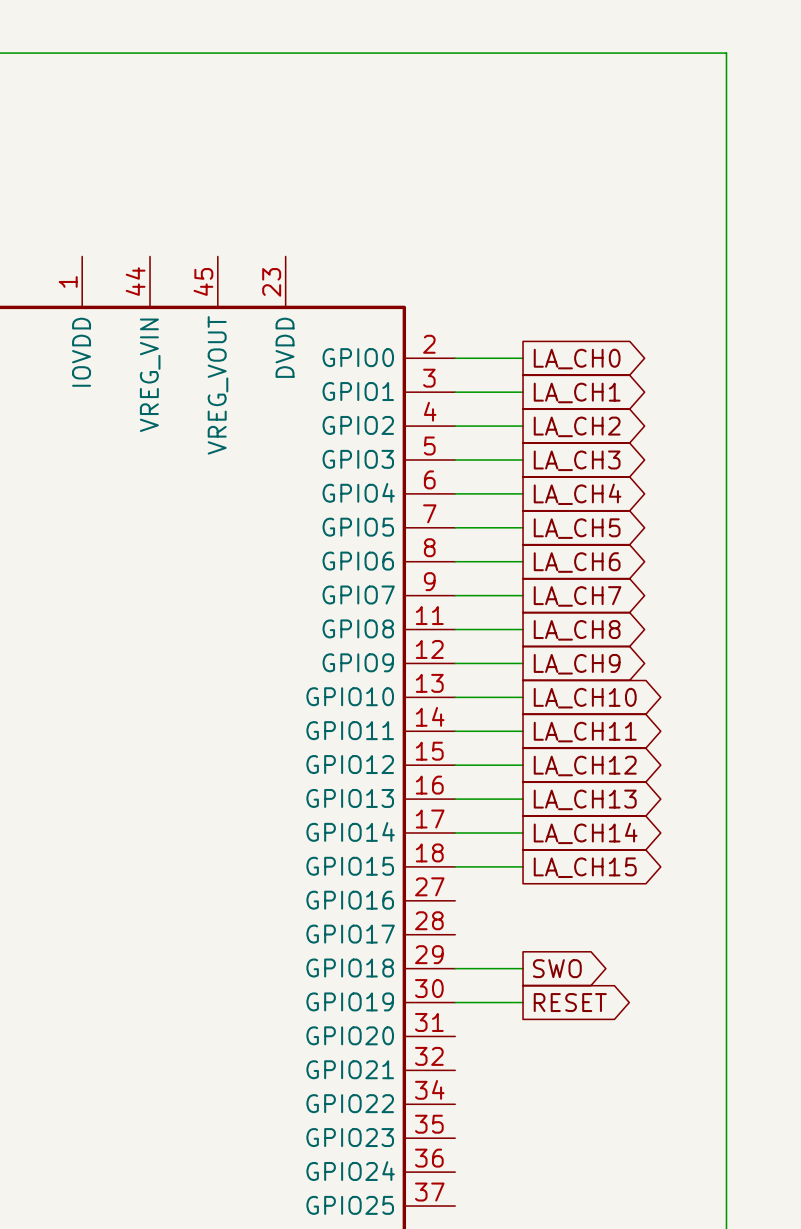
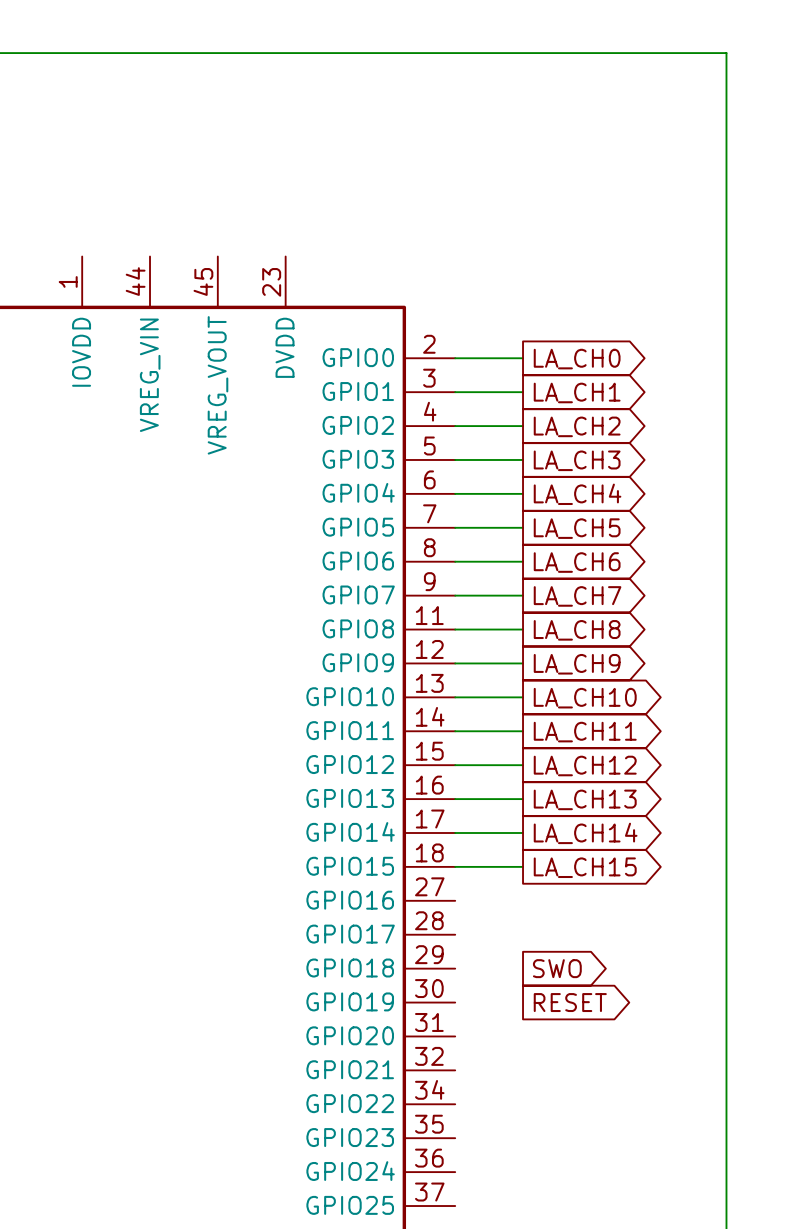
wire: (455, 968) (523, 968) -> none
wire: (455, 1002) (523, 1002) -> none

